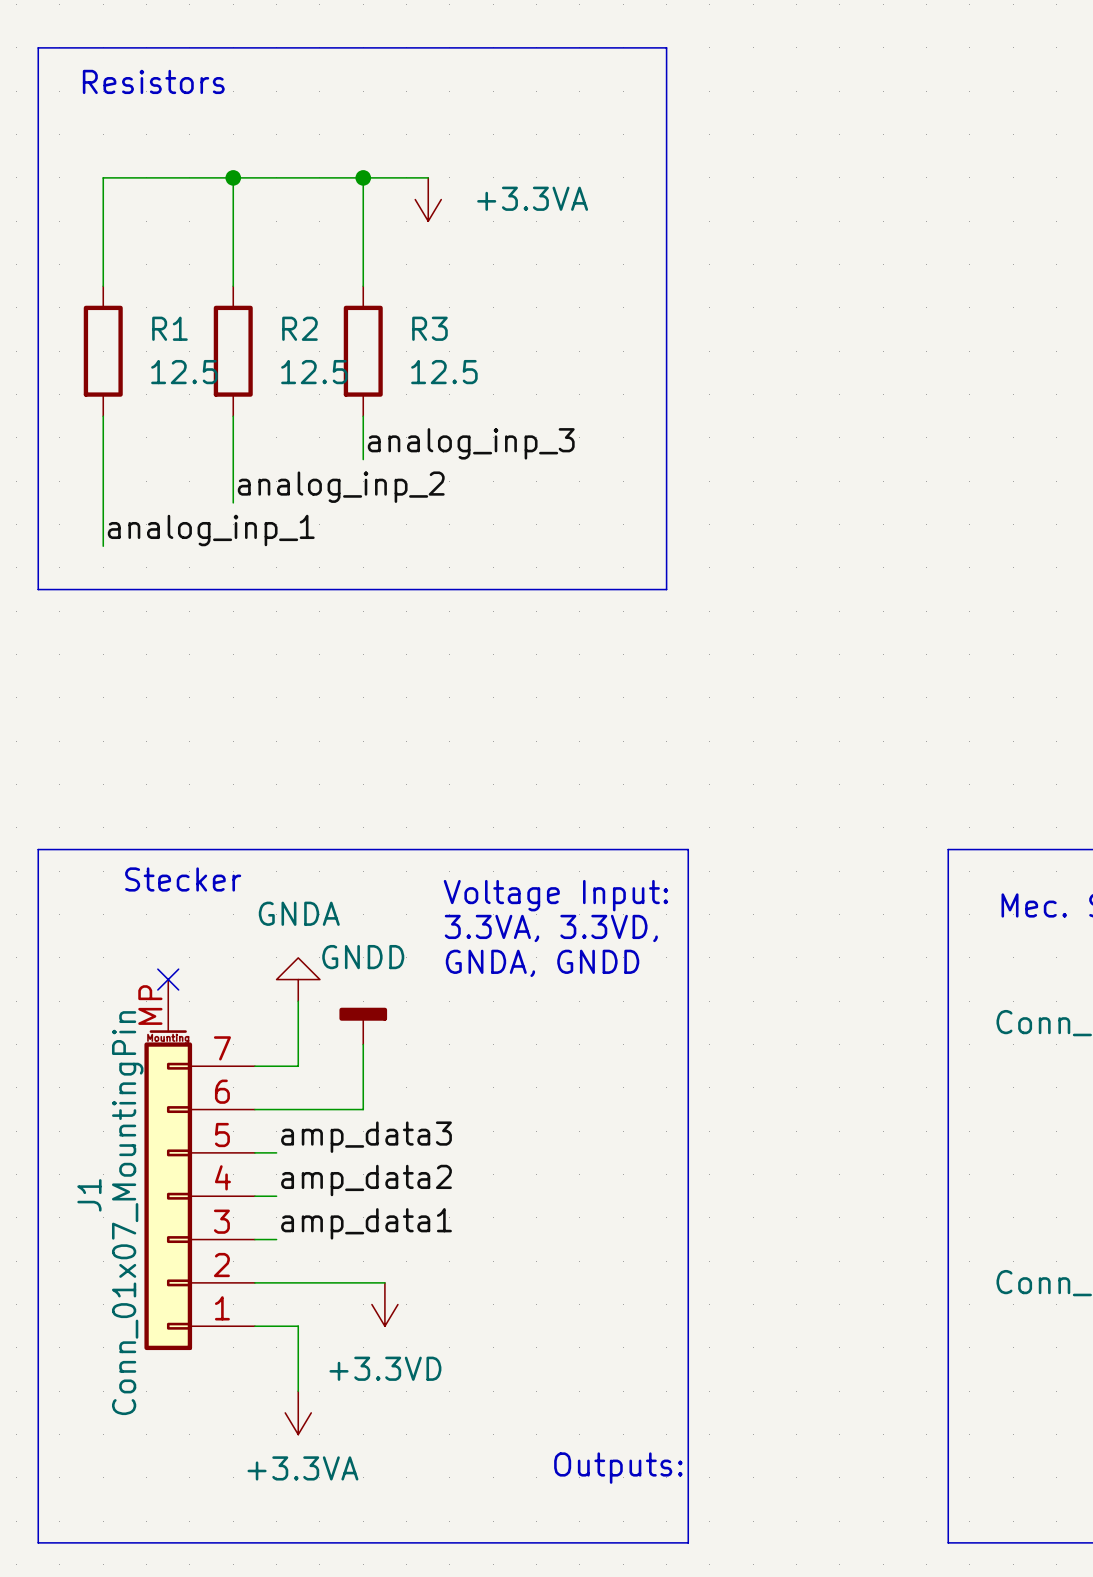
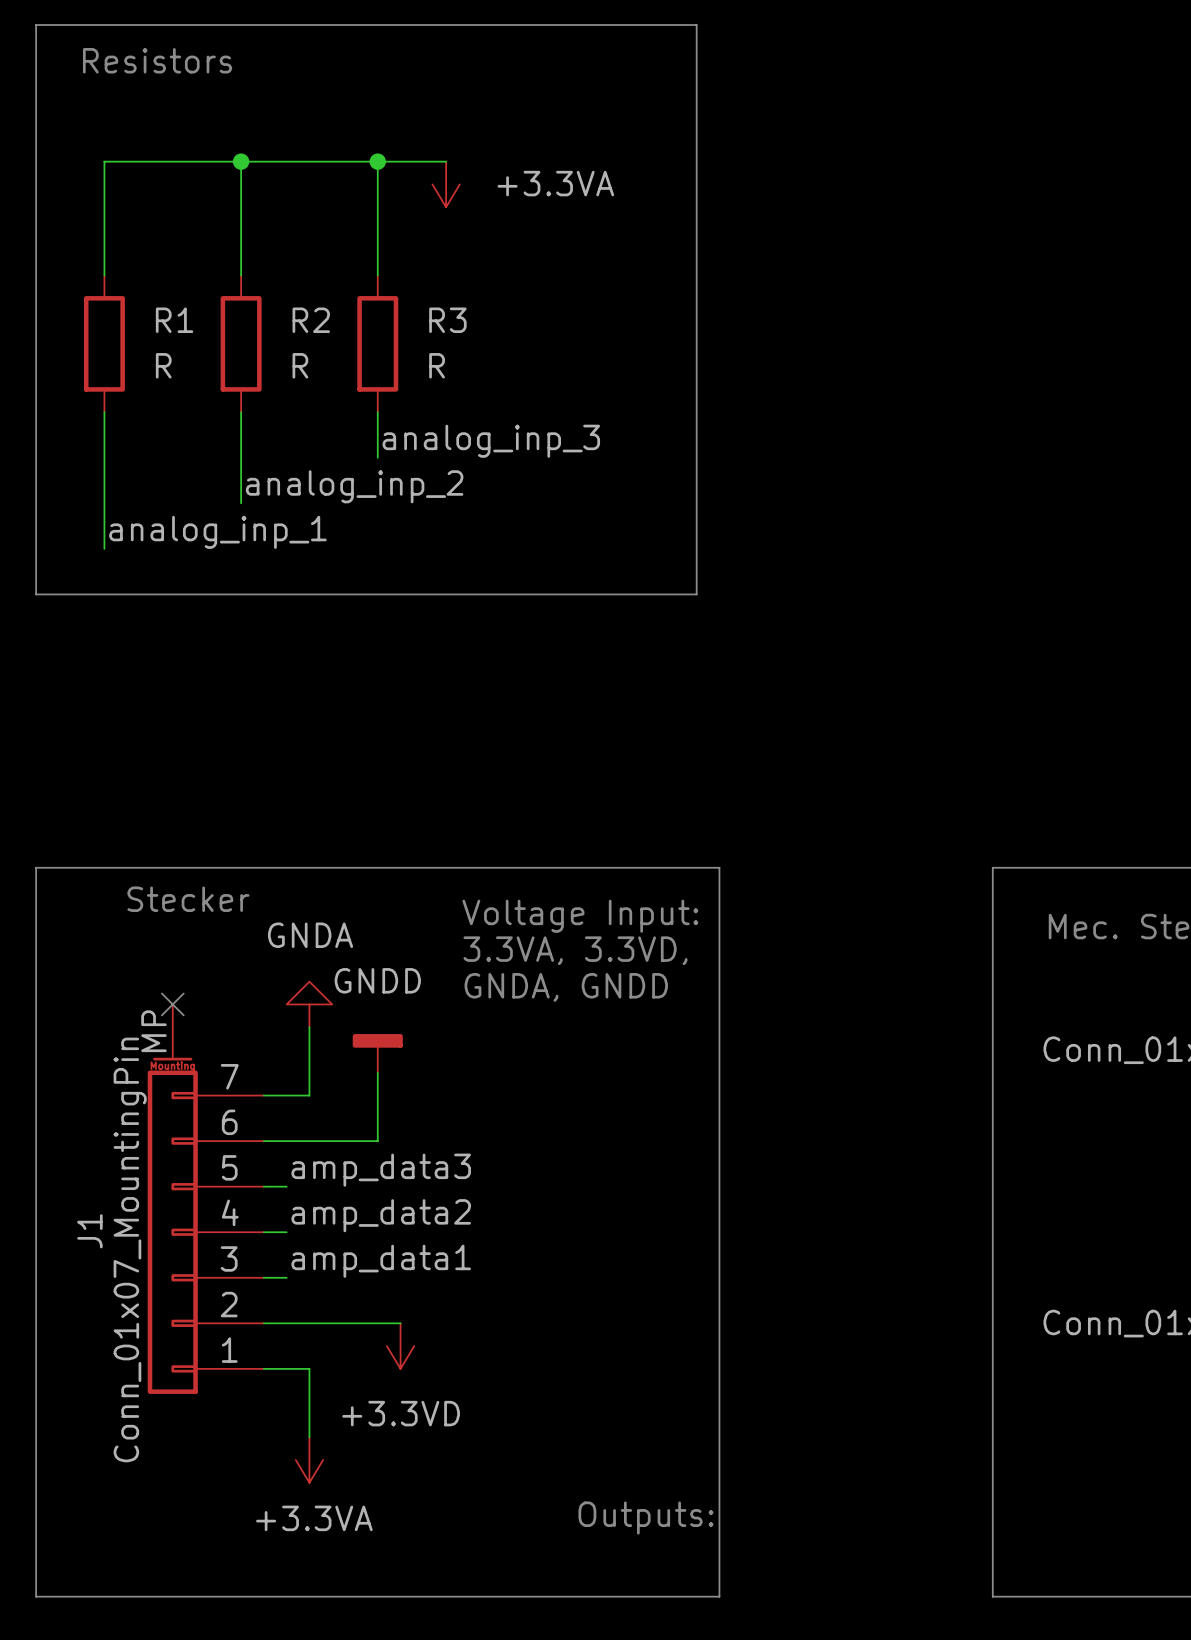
R1 value: 12.5 (184, 372) -> R (163, 365)
R2 value: 12.5 (314, 372) -> R (300, 365)
R3 value: 12.5 (444, 372) -> R (437, 365)

